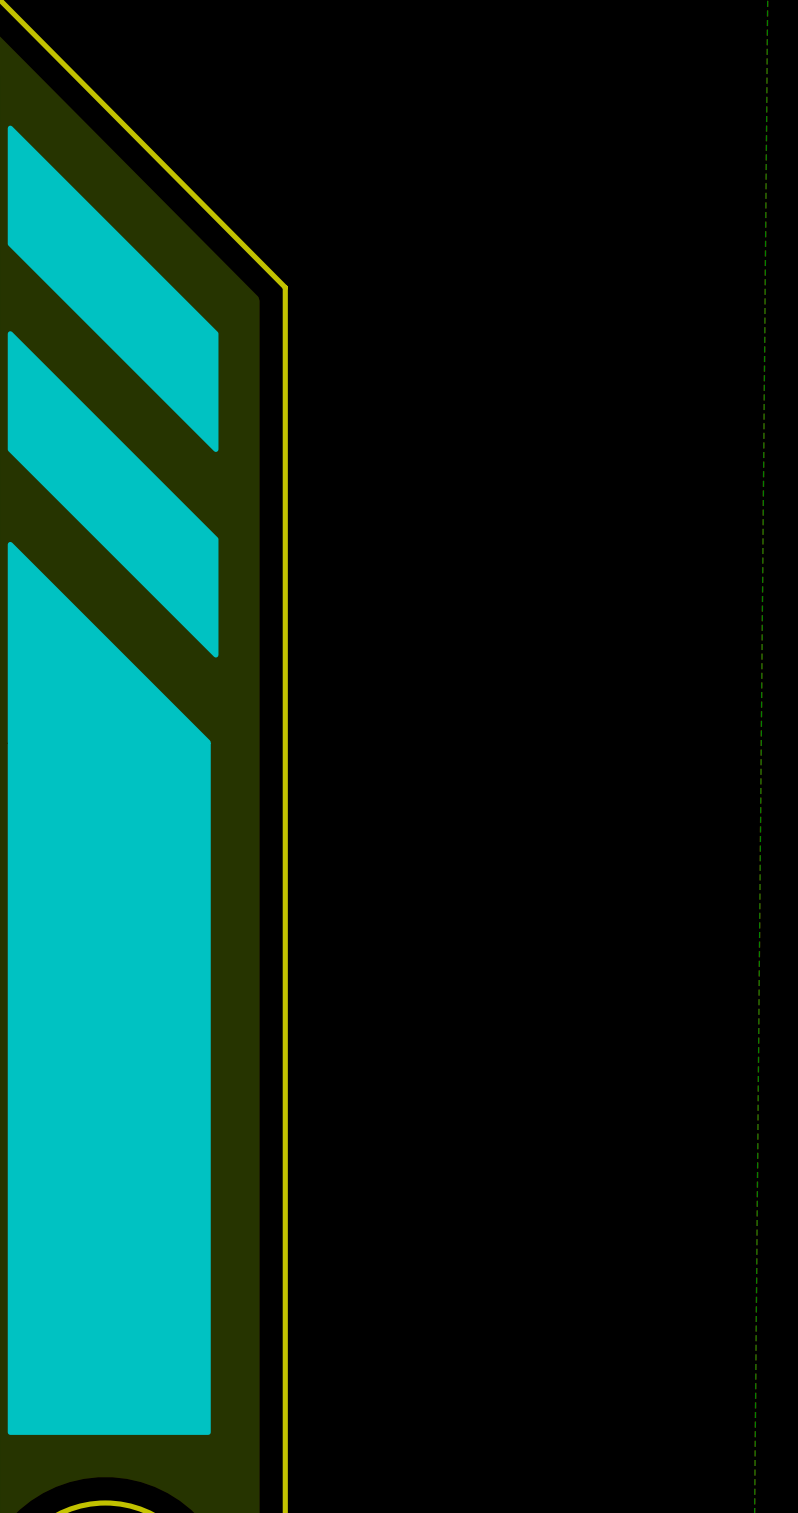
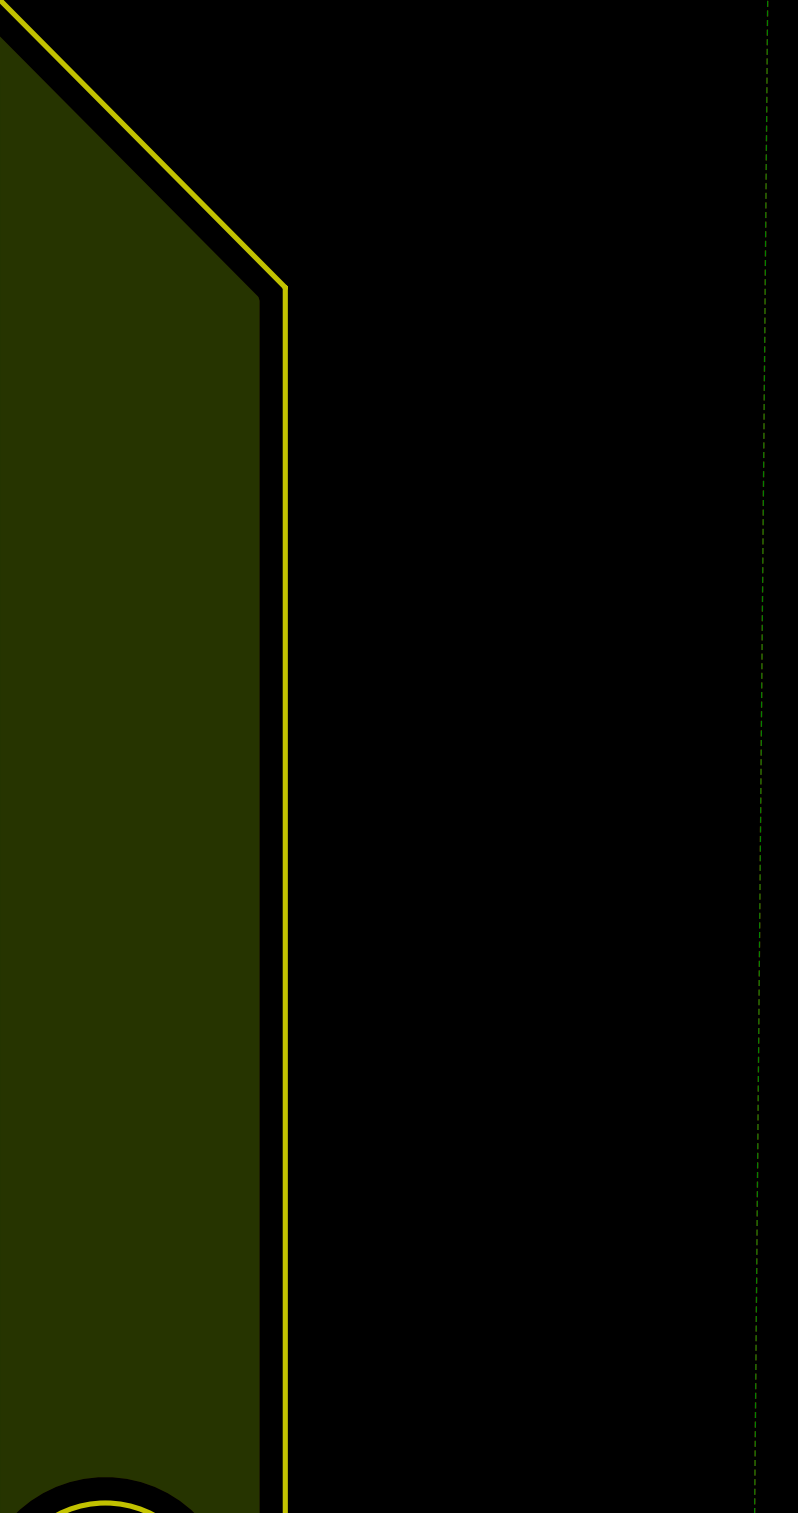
drawing: [7, 125, 219, 1435] -> none

